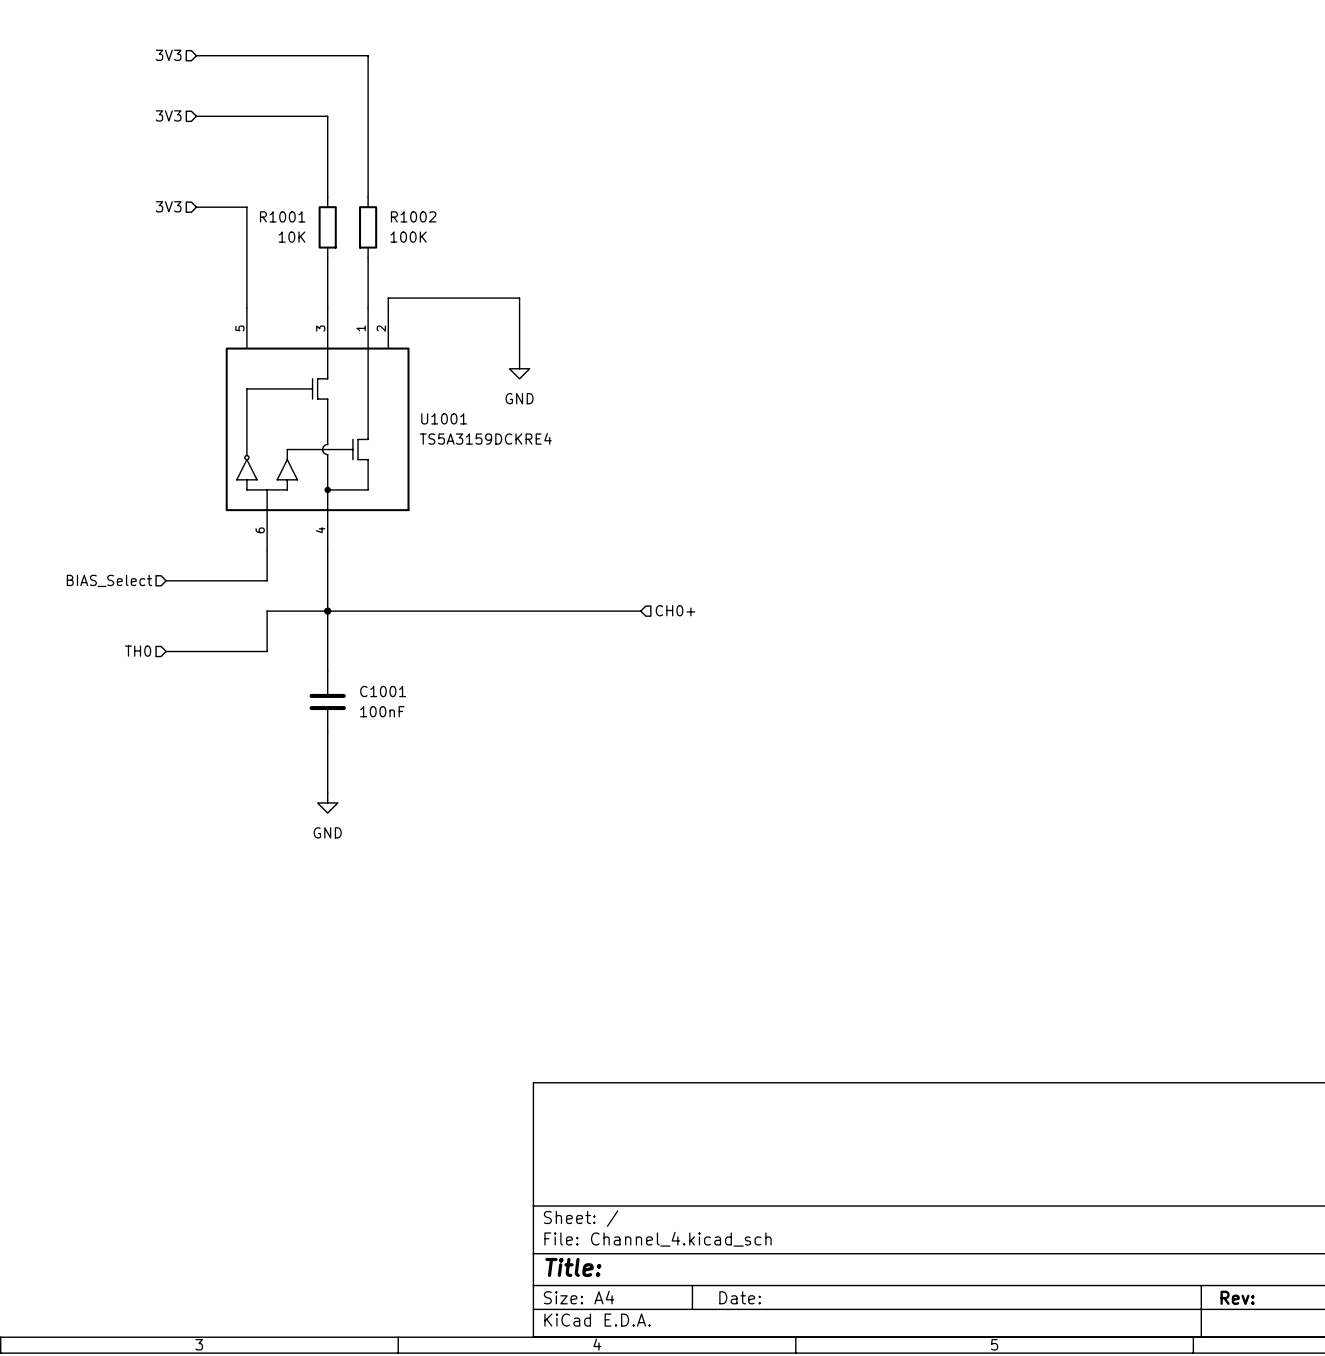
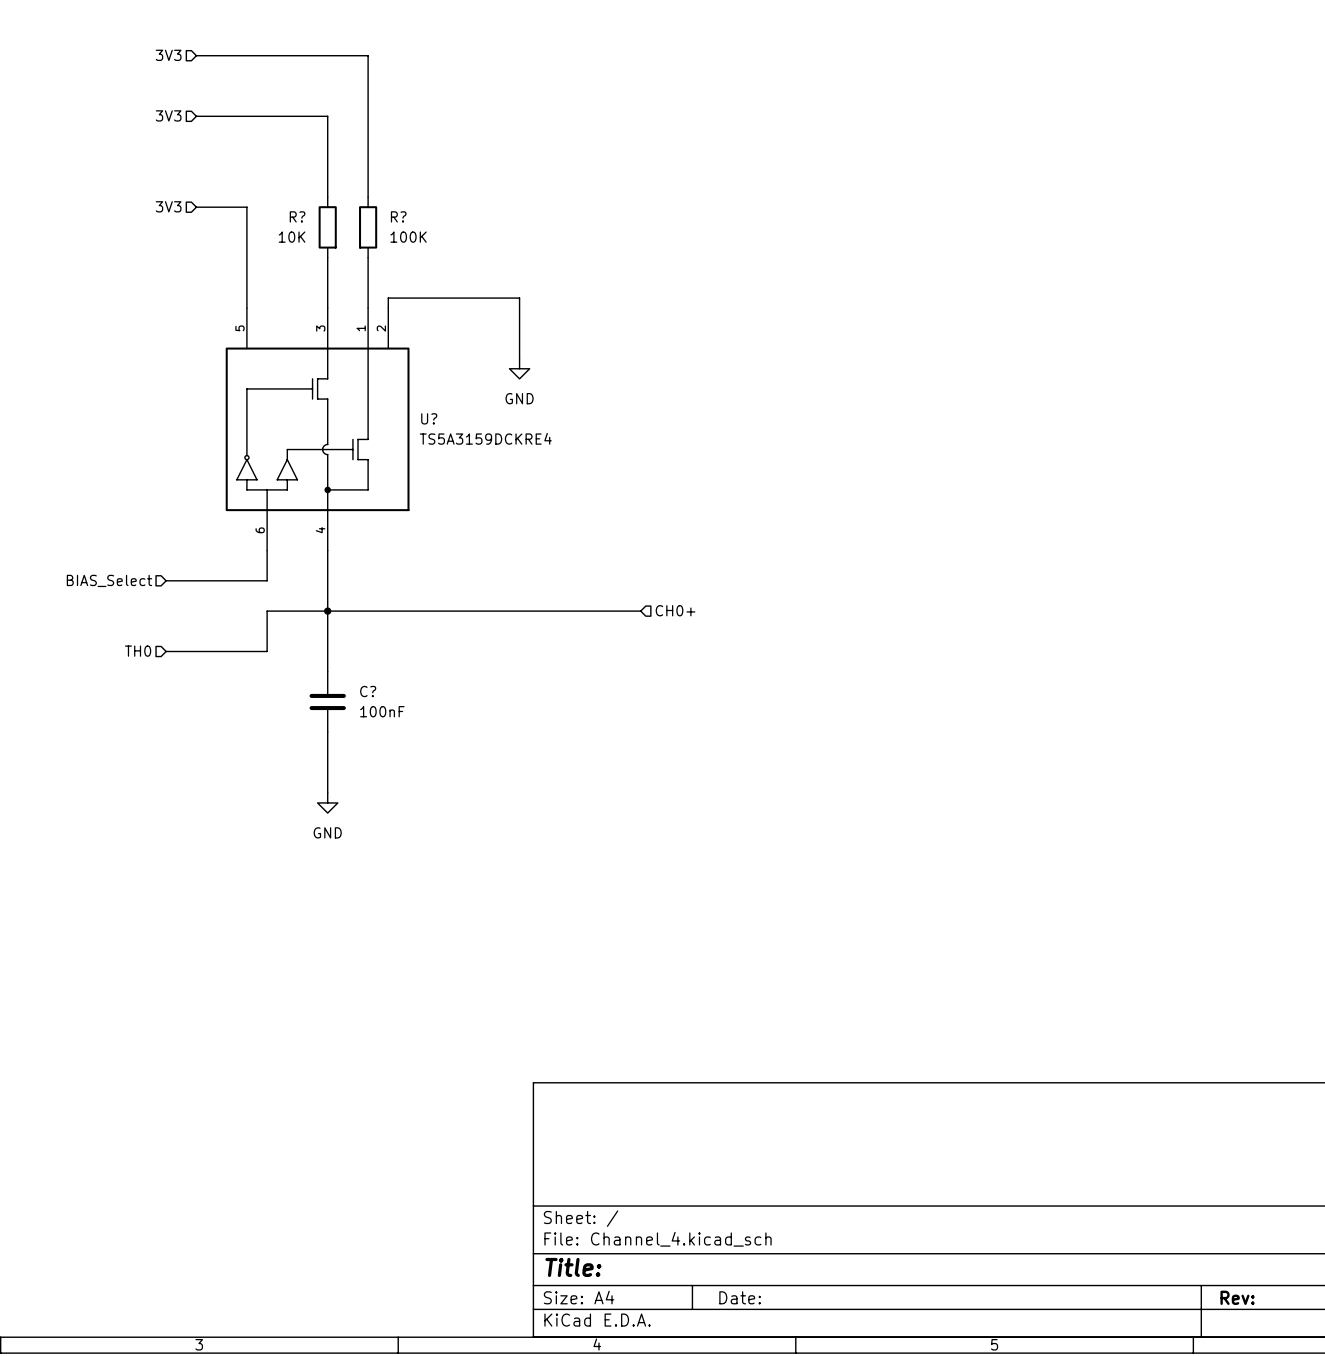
R1001 name: R1001 (282, 216) -> R? (297, 216)
R1002 name: R1002 (413, 216) -> R? (398, 216)
U1001 name: U1001 (444, 418) -> U? (429, 418)
C1001 name: C1001 (383, 691) -> C? (368, 691)

